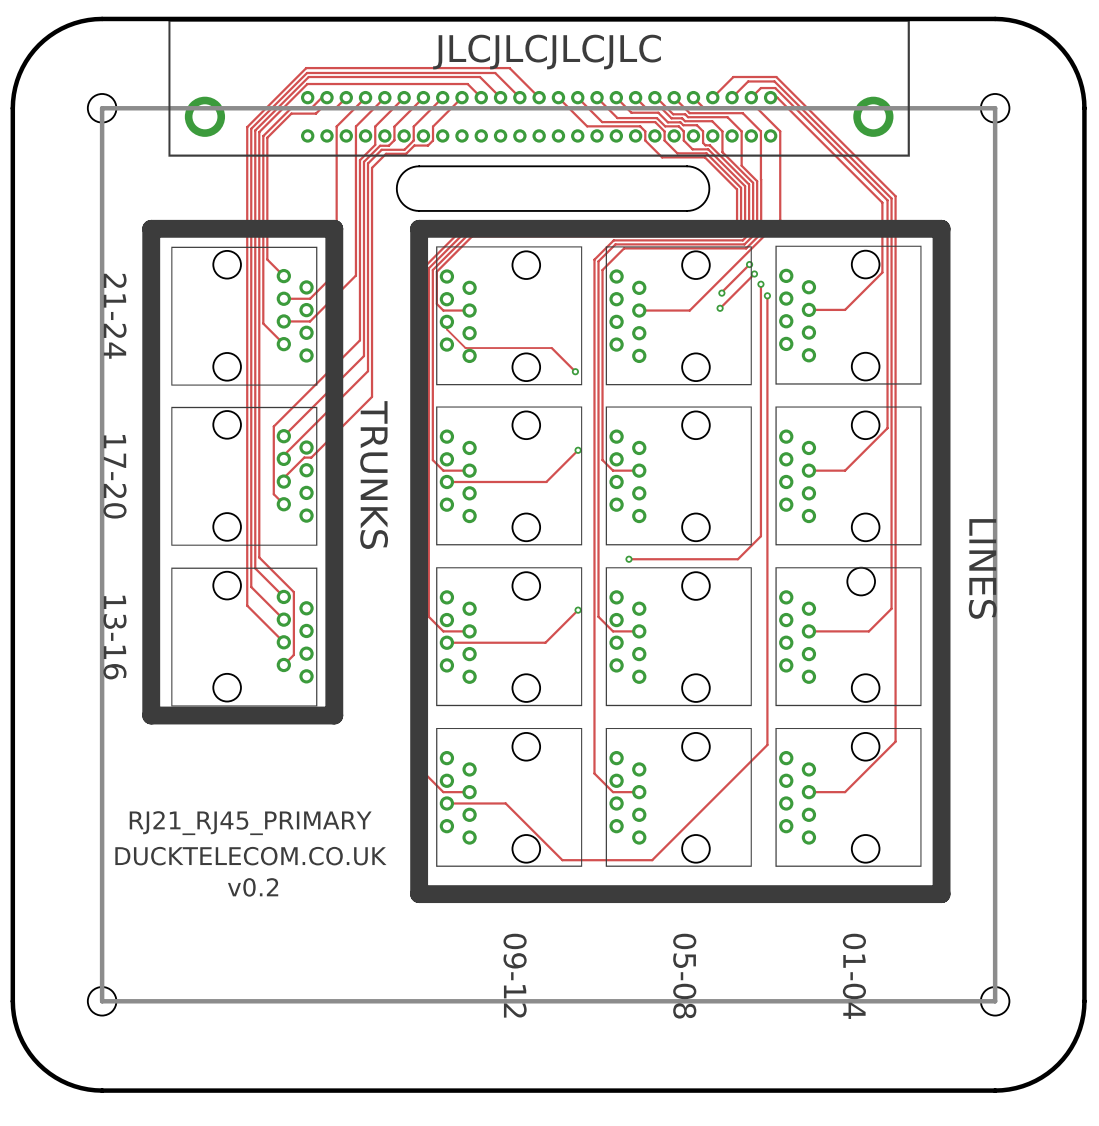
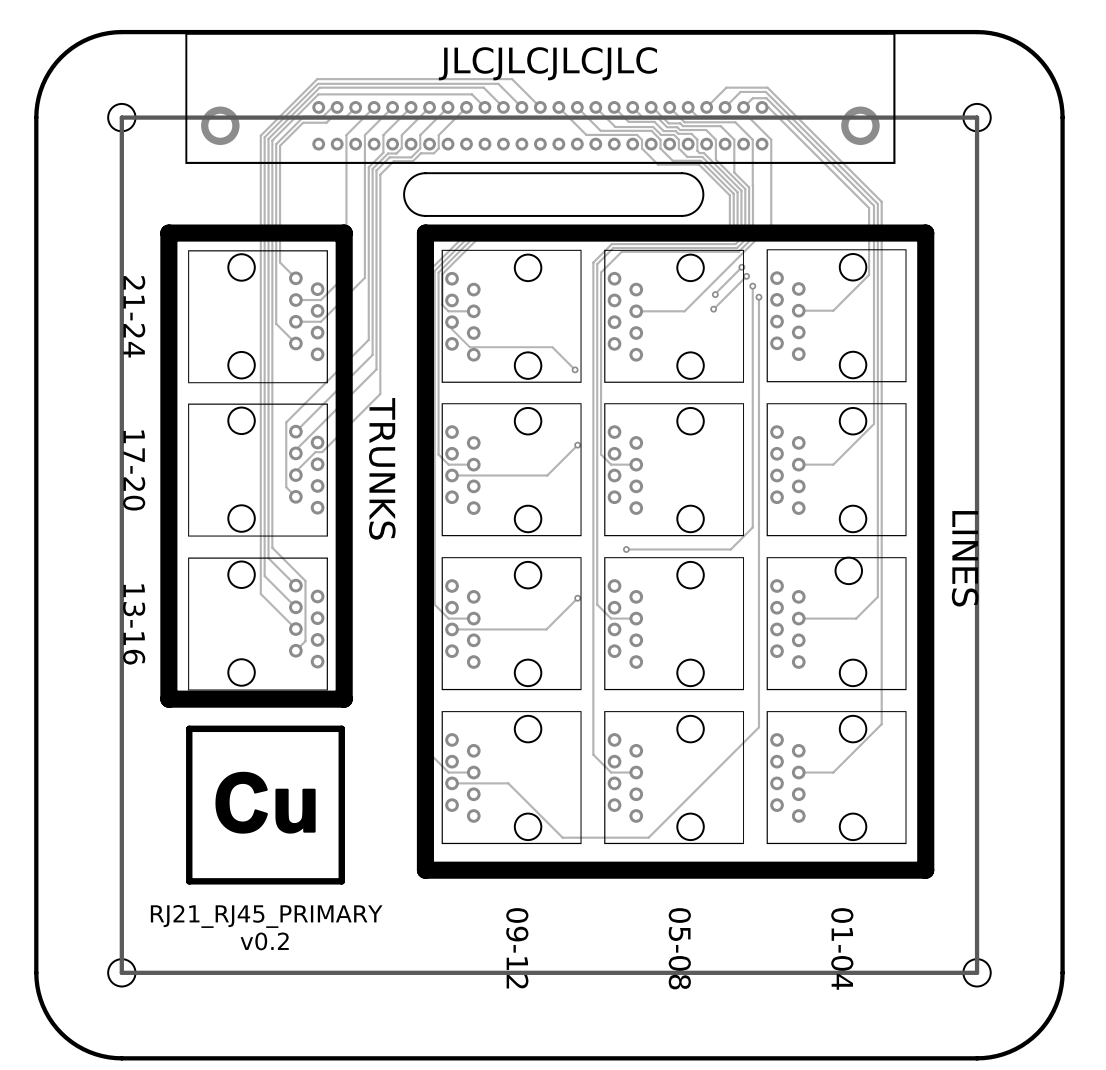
line: none -> (189, 728) (341, 728) (341, 881) (189, 881) (189, 728)
drawing: none -> [215, 771, 316, 834]
text position: RJ21_RJ45_PRIMARY (250, 823) -> RJ21_RJ45_PRIMARY (266, 916)
text: DUCKTELECOM.CO.UK (250, 856) -> none
text position: v0.2 (253, 887) -> v0.2 (264, 941)

